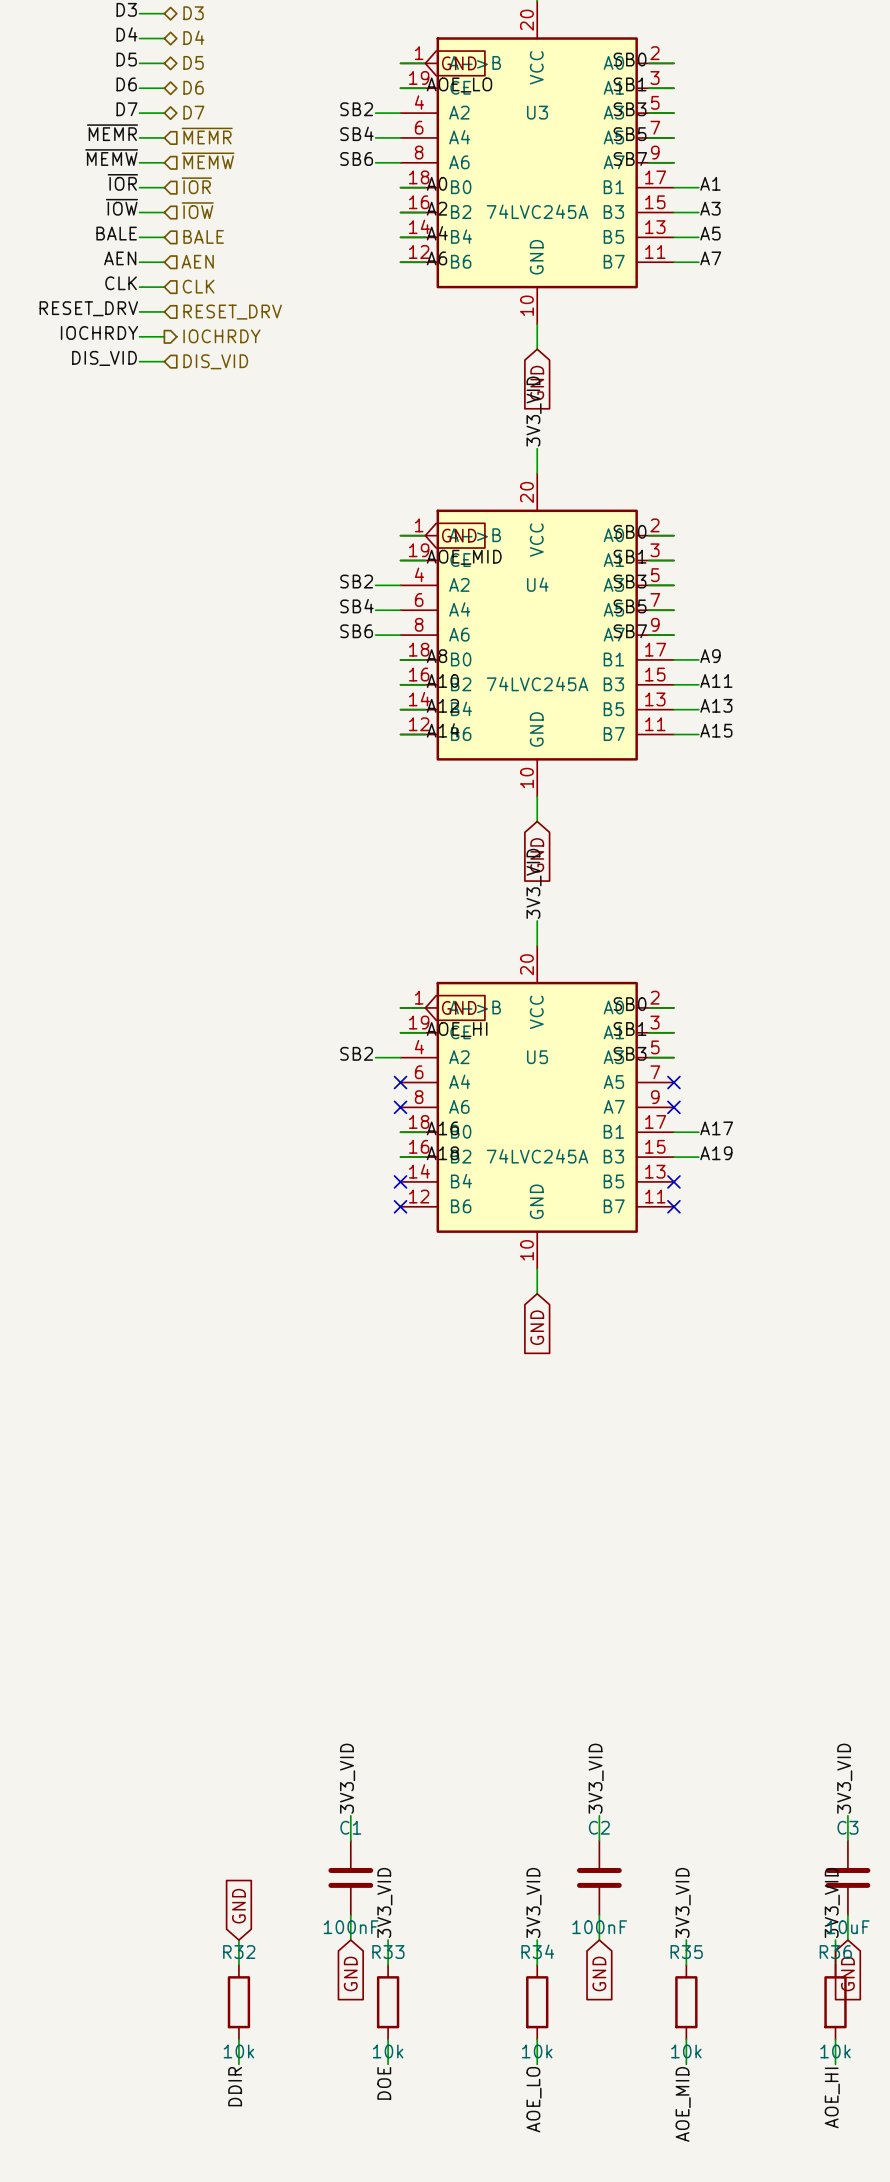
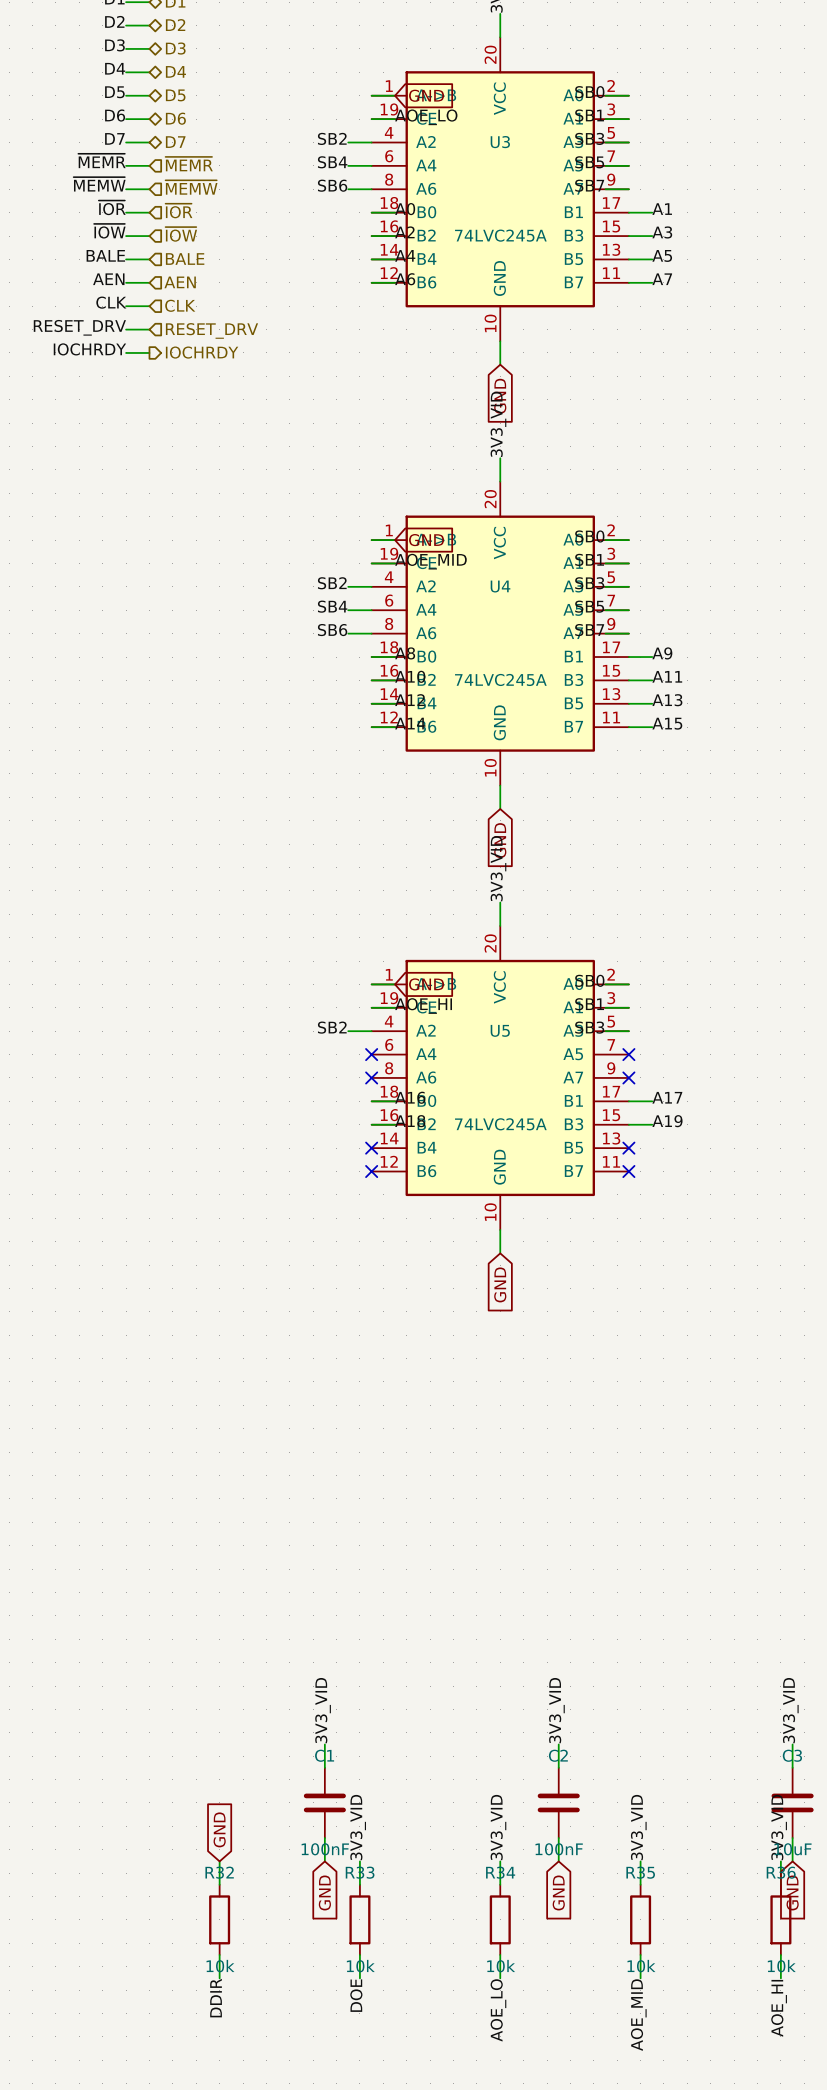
label: DIS_VID (104, 358) -> none
wire: (139, 361) (164, 361) -> none
hierarchical label: DIS_VID (215, 361) -> none

